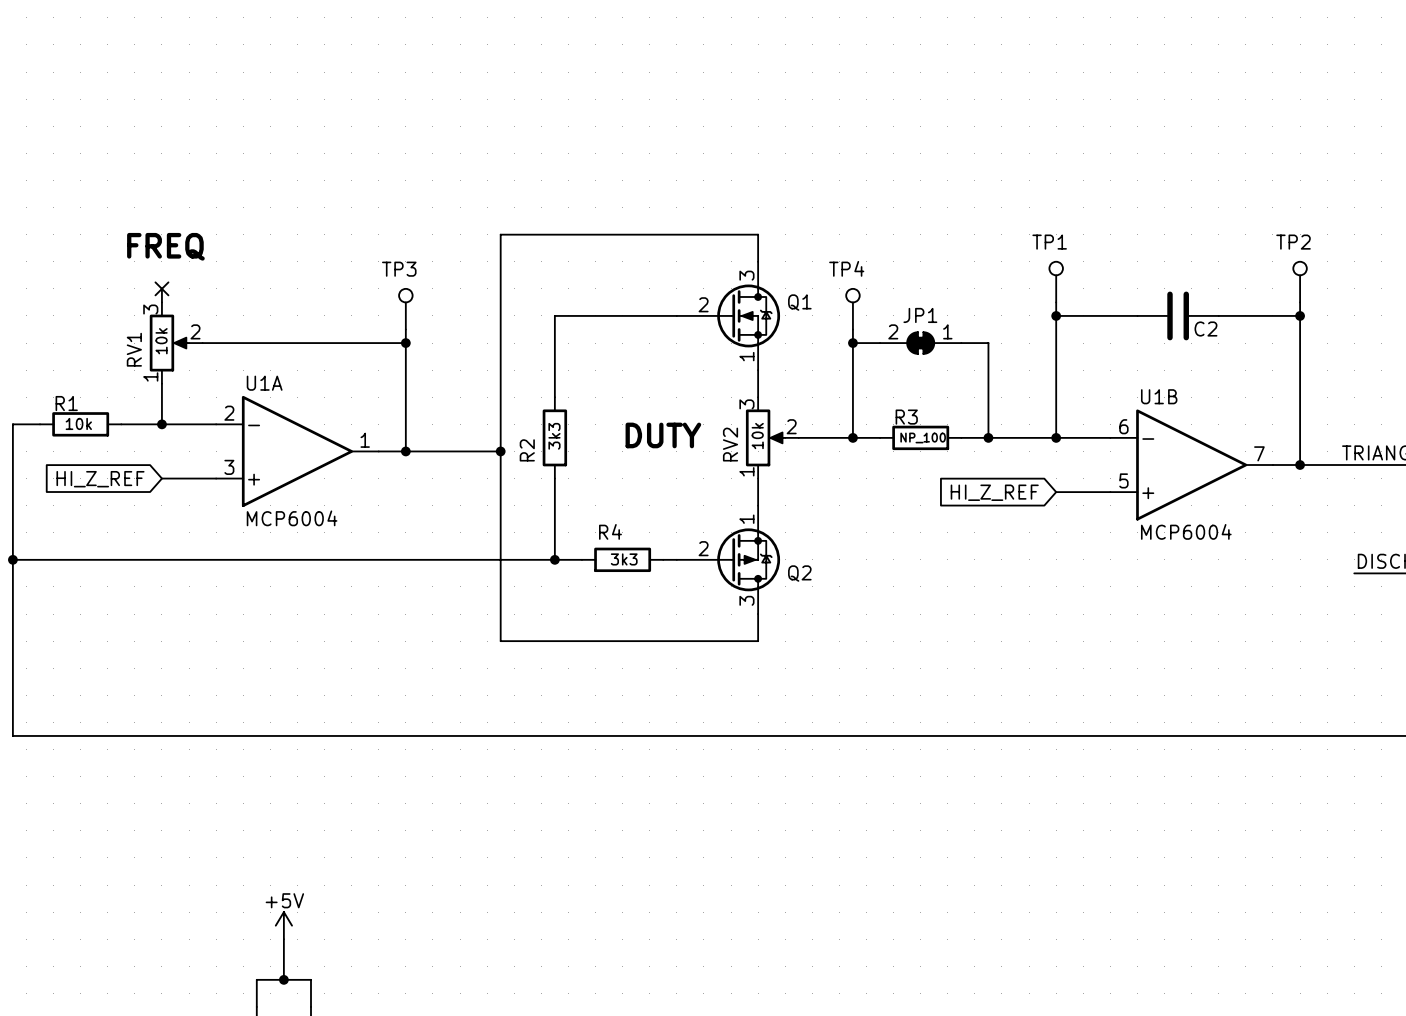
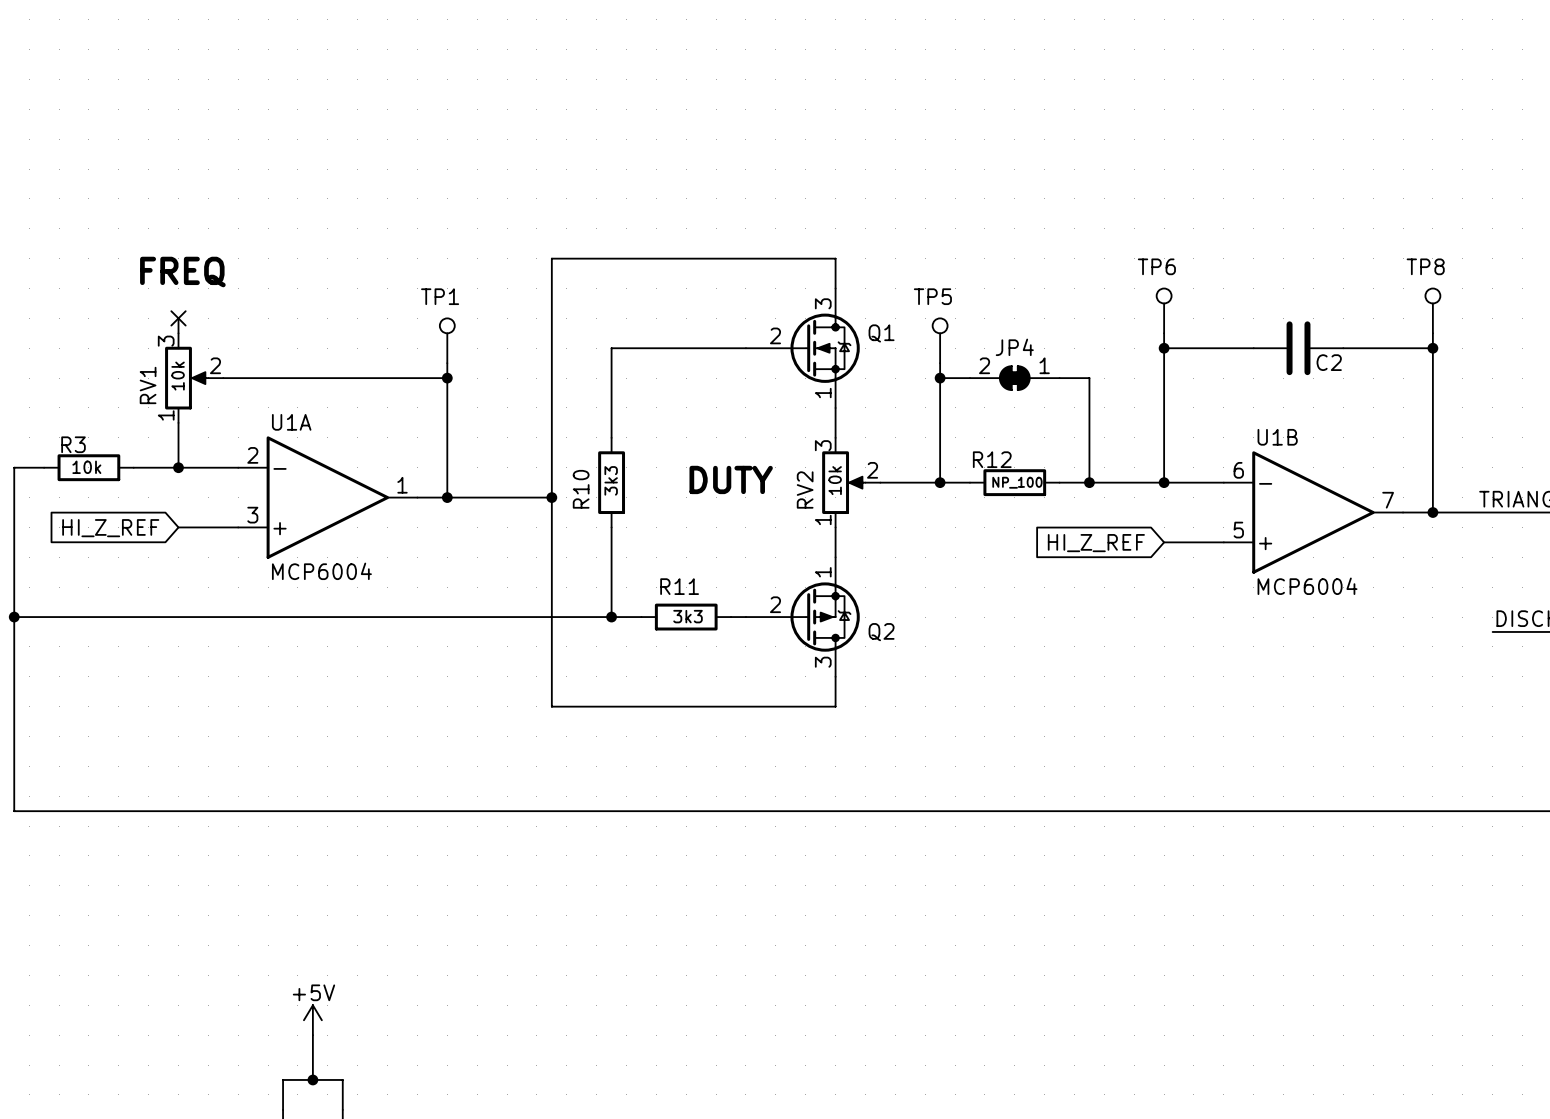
TP1 name: TP1 (1049, 242) -> TP6 (1156, 266)
TP2 name: TP2 (1293, 242) -> TP8 (1425, 266)
TP4 name: TP4 (846, 268) -> TP5 (932, 296)
TP3 name: TP3 (399, 269) -> TP1 (440, 296)
JP1 name: JP1 (920, 315) -> JP4 (1014, 347)
R1 name: R1 (66, 403) -> R3 (73, 444)
R3 name: R3 (906, 417) -> R12 (992, 459)
R2 name: R2 (527, 450) -> R10 (581, 489)
R4 name: R4 (610, 531) -> R11 (679, 586)

